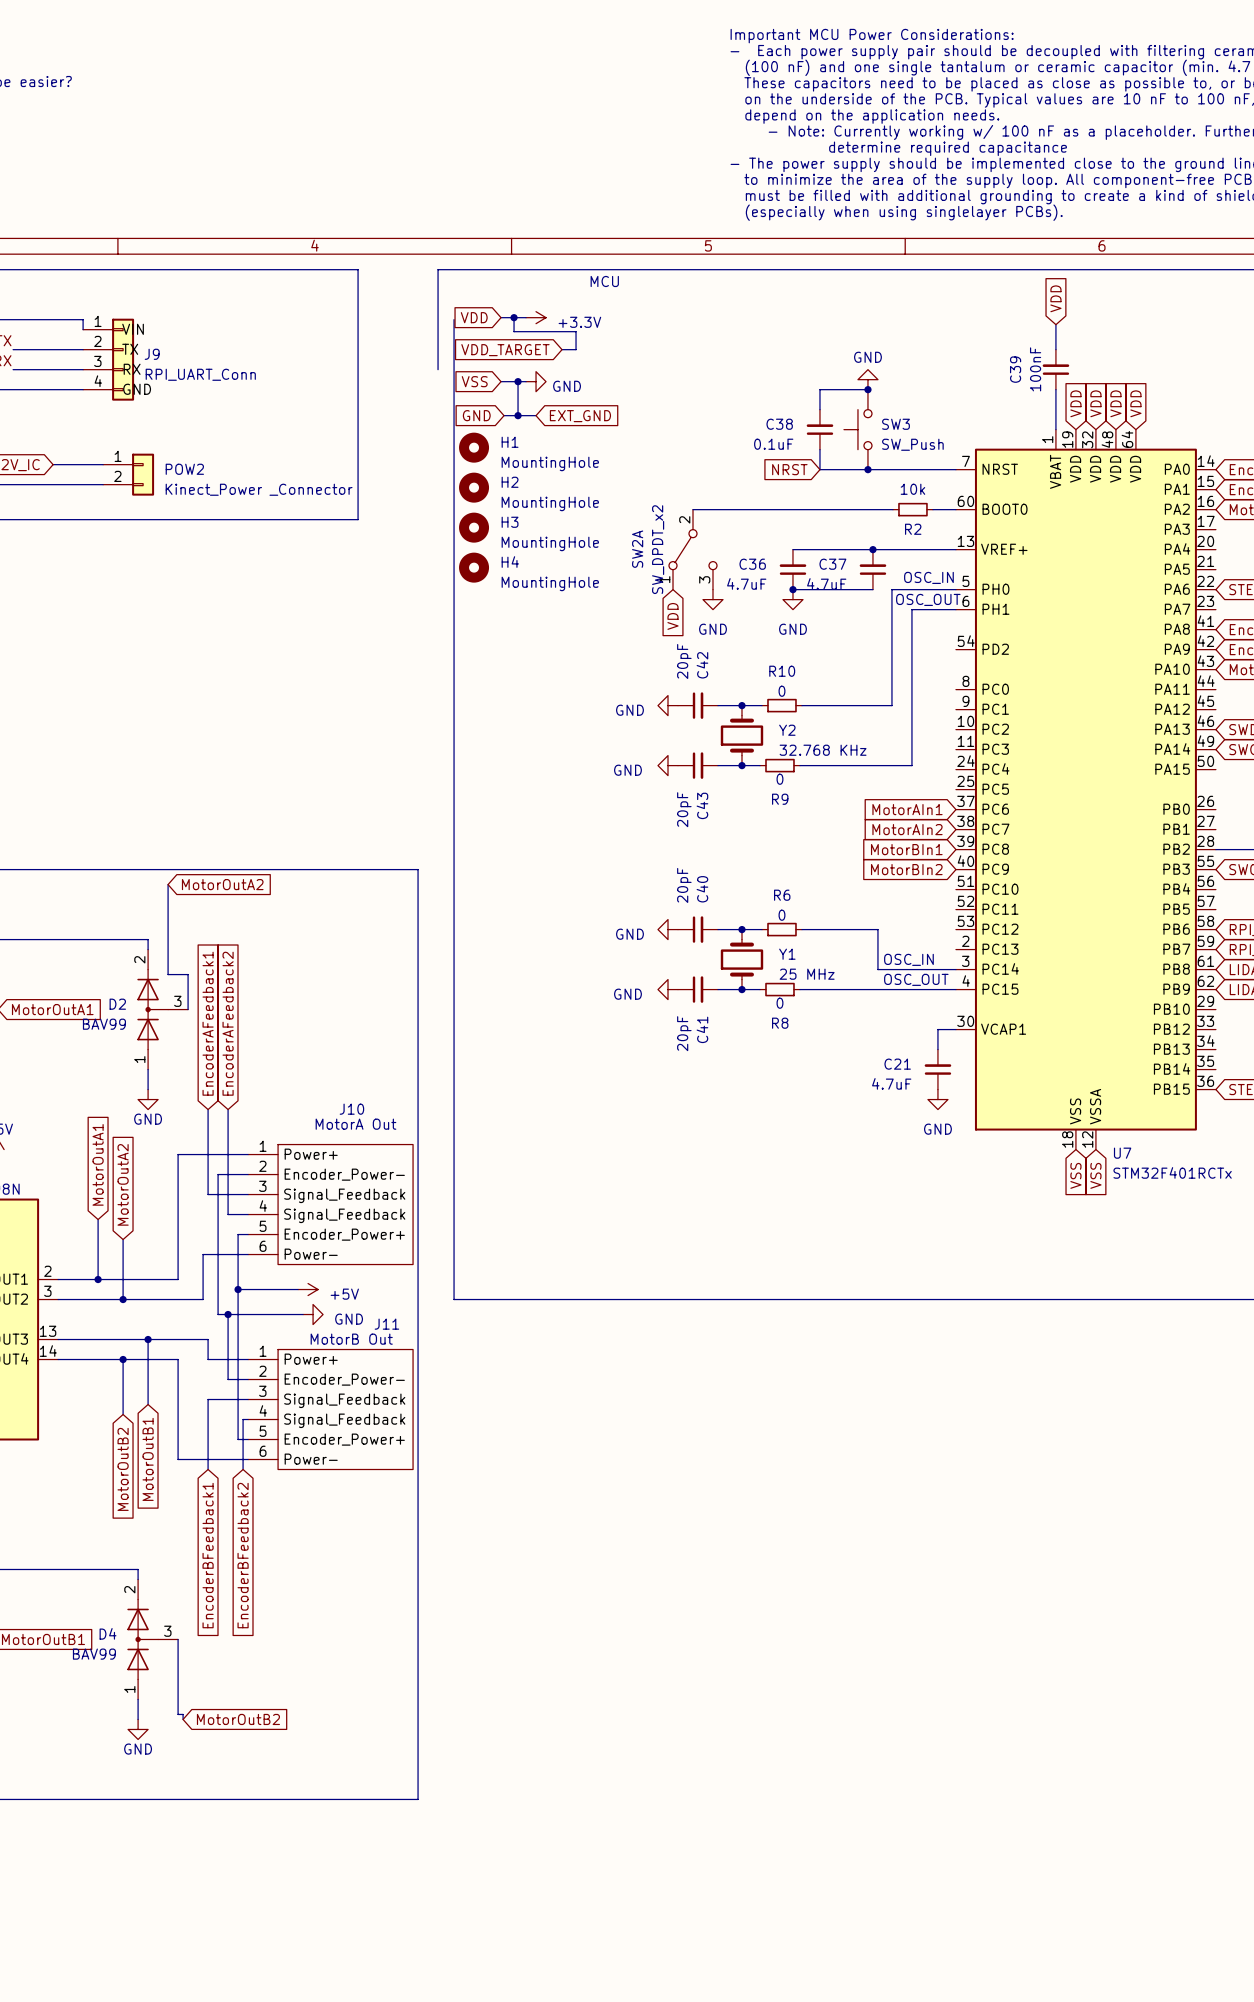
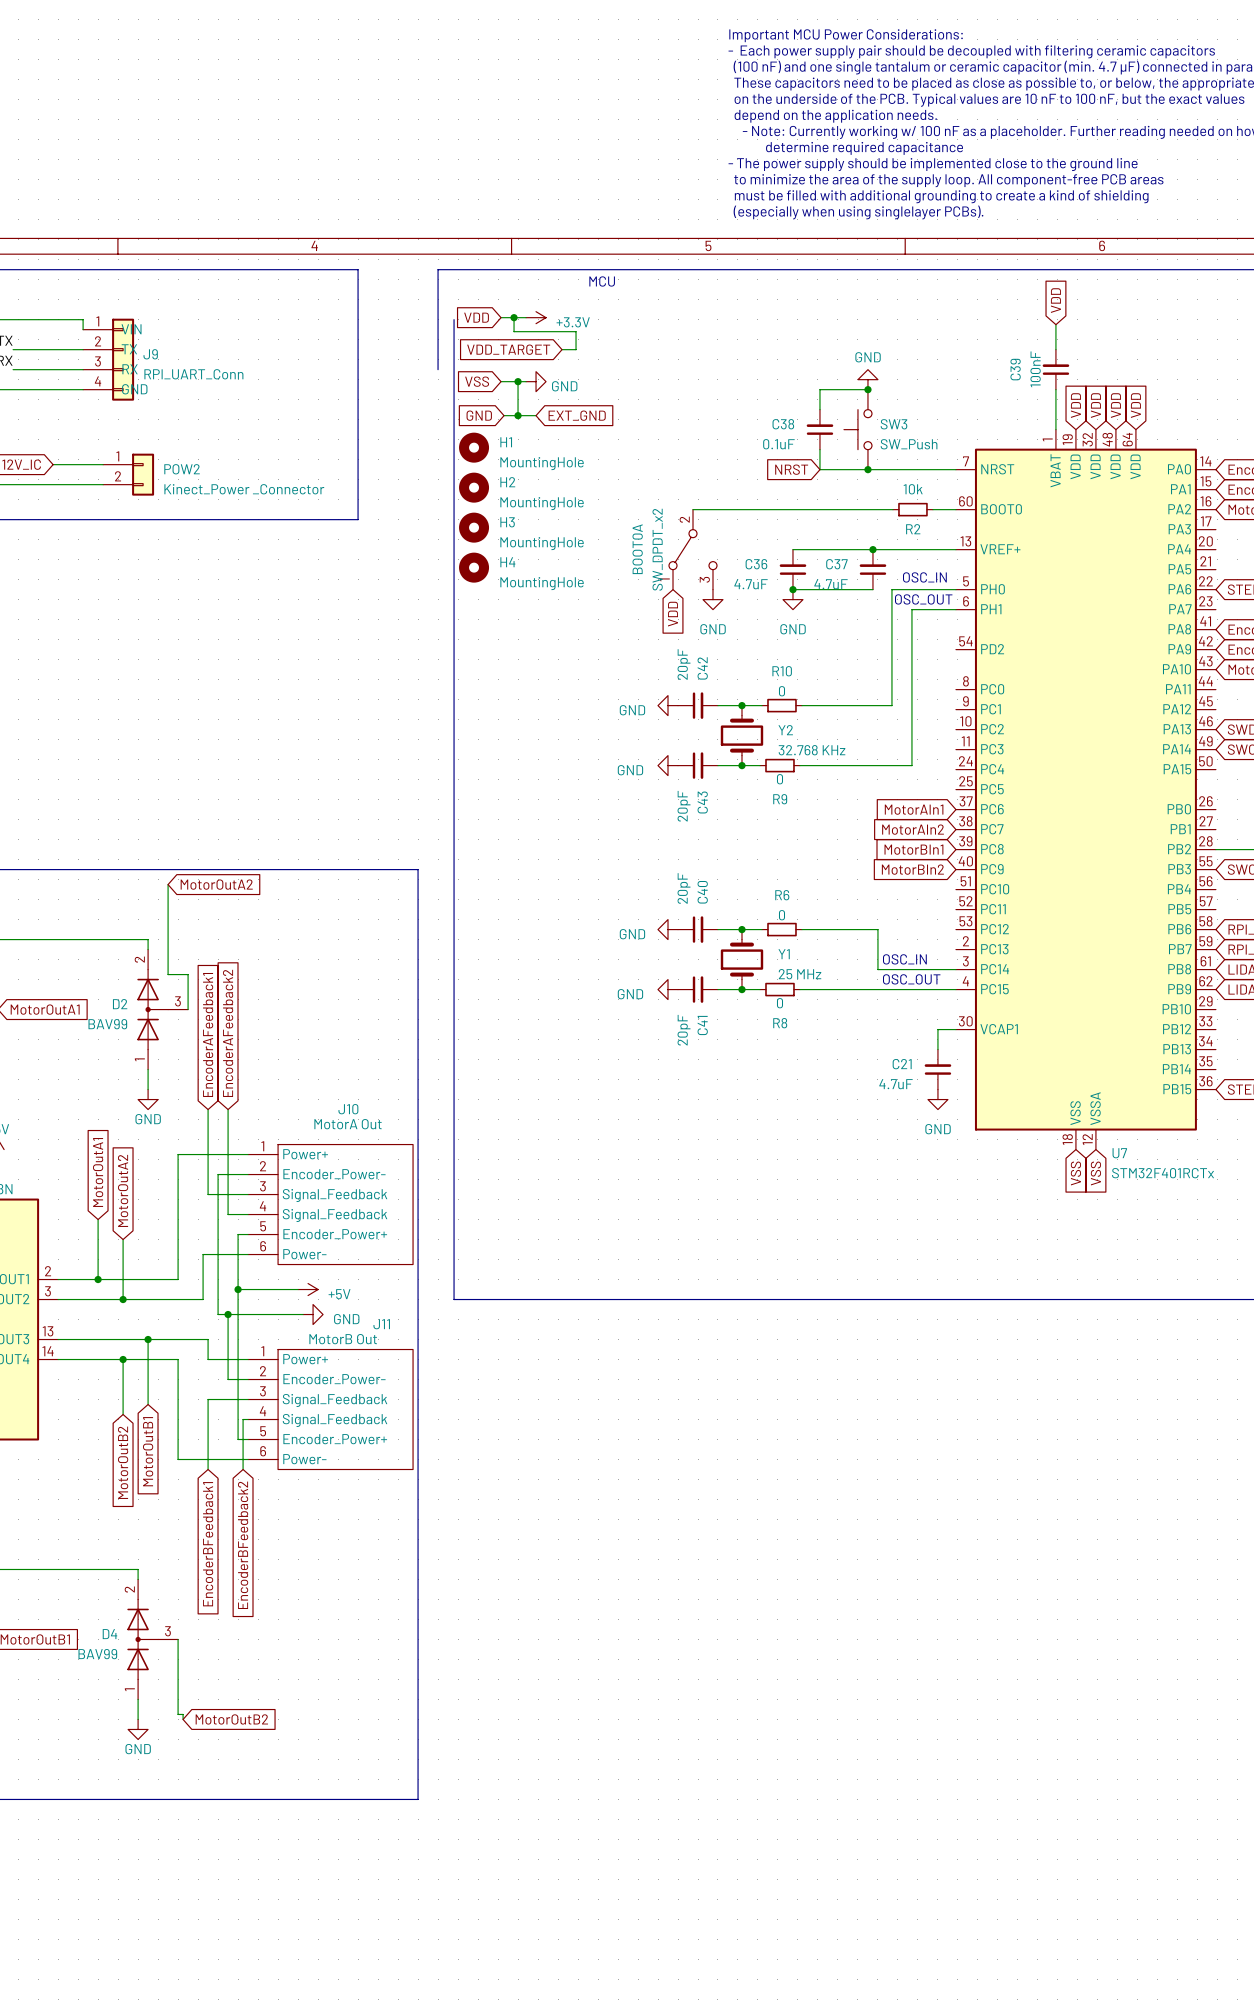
SW2A name: SW2A (637, 549) -> BOOT0A (637, 549)

